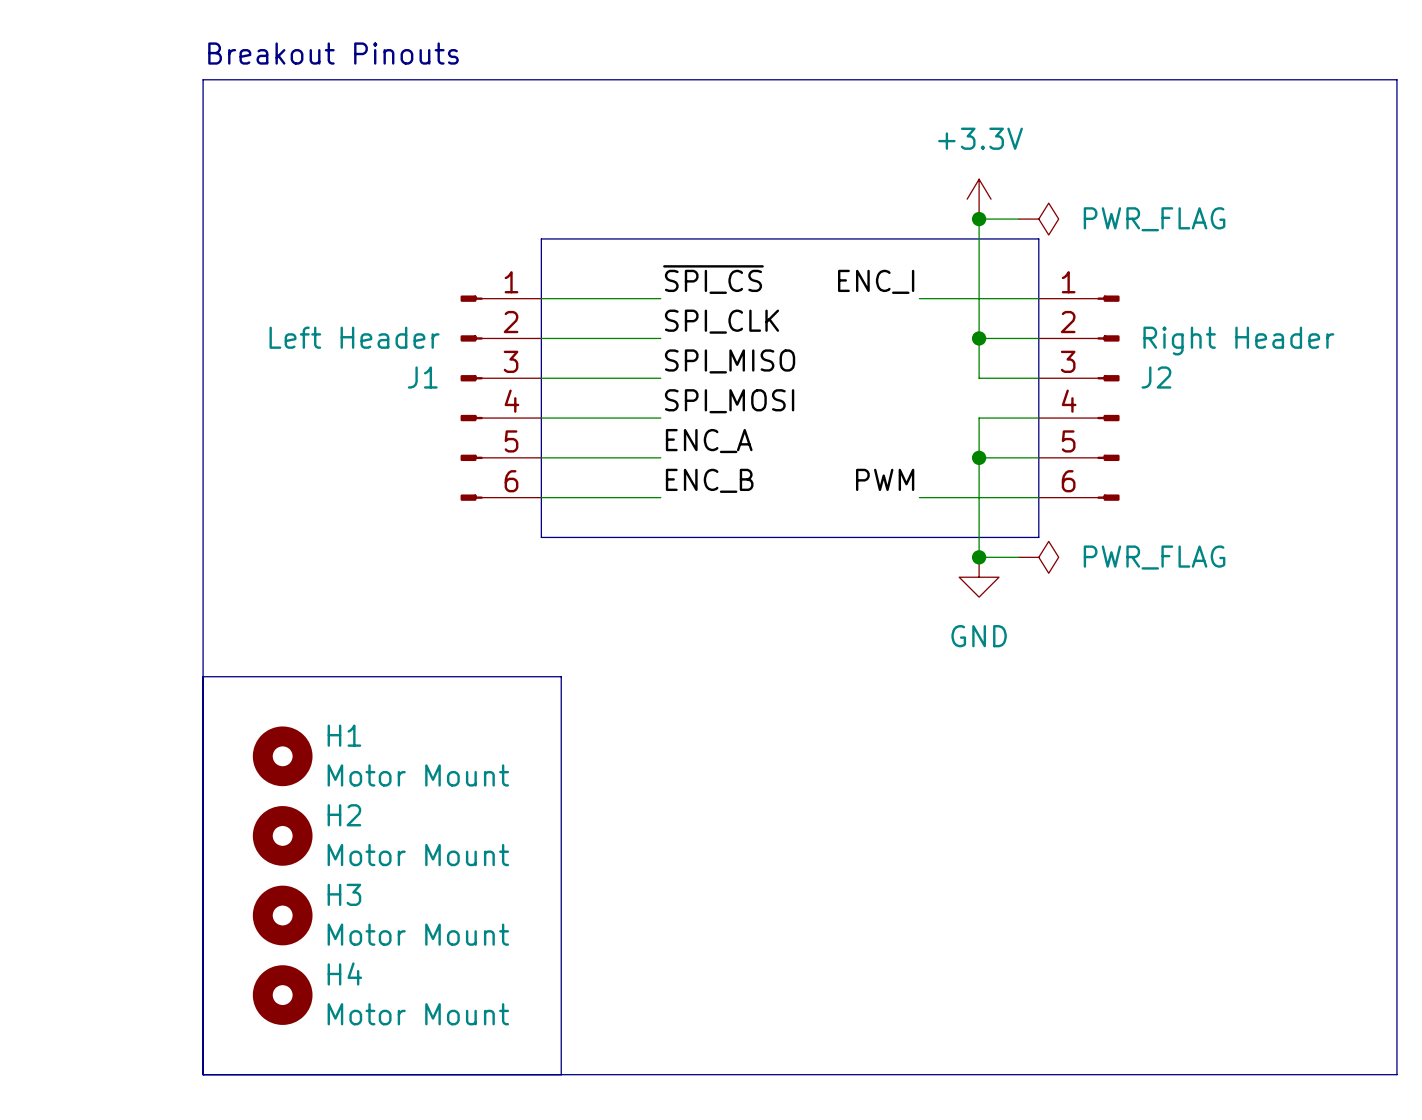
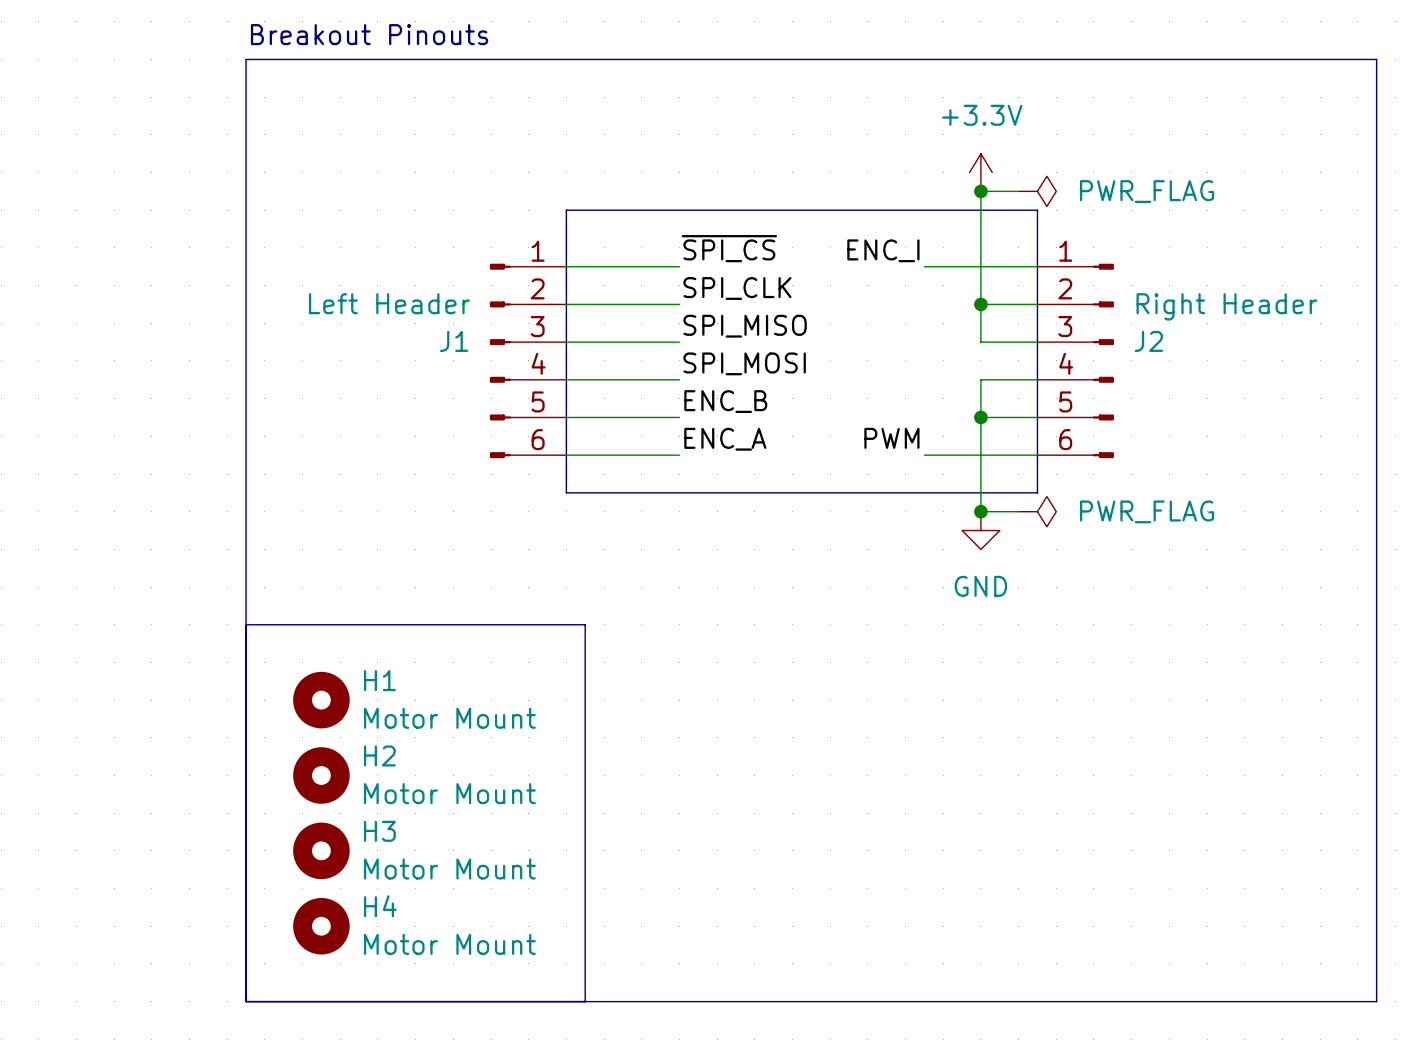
label: ENC_A (709, 441) -> ENC_B (725, 401)
label: ENC_B (709, 480) -> ENC_A (725, 439)

